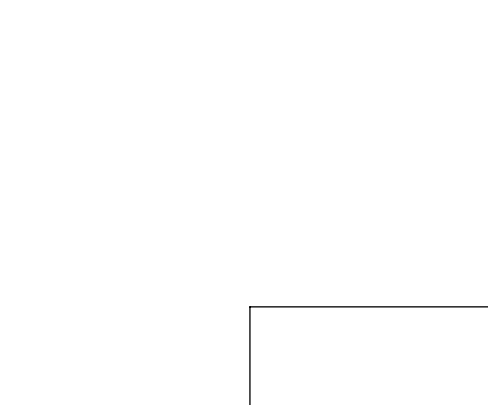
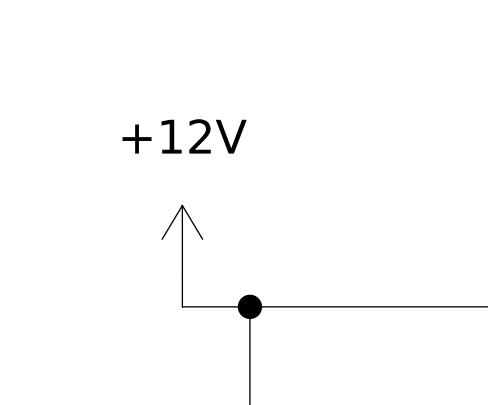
power symbol: none -> +12V (182, 239)
wire: none -> (182, 273) (182, 306) (249, 306)
junction: none -> (249, 306)

